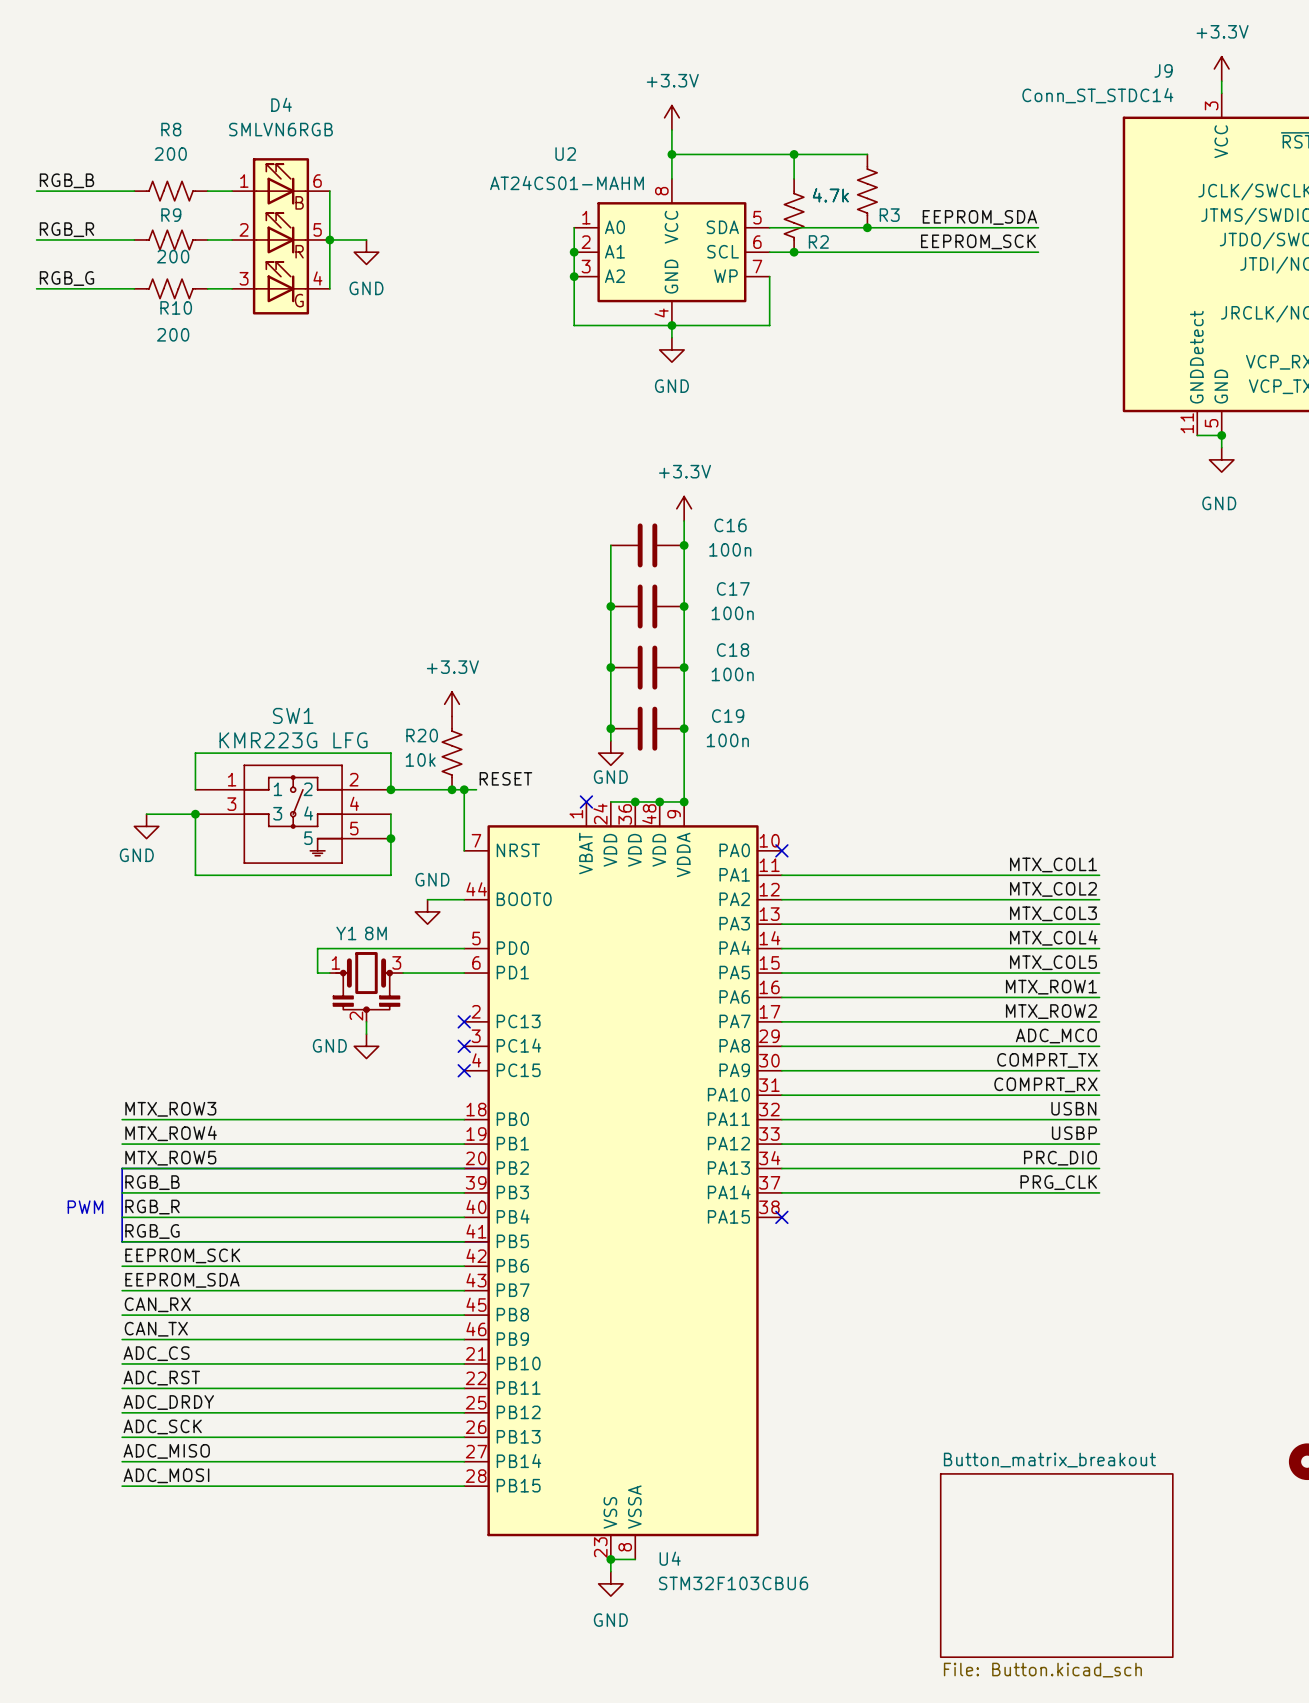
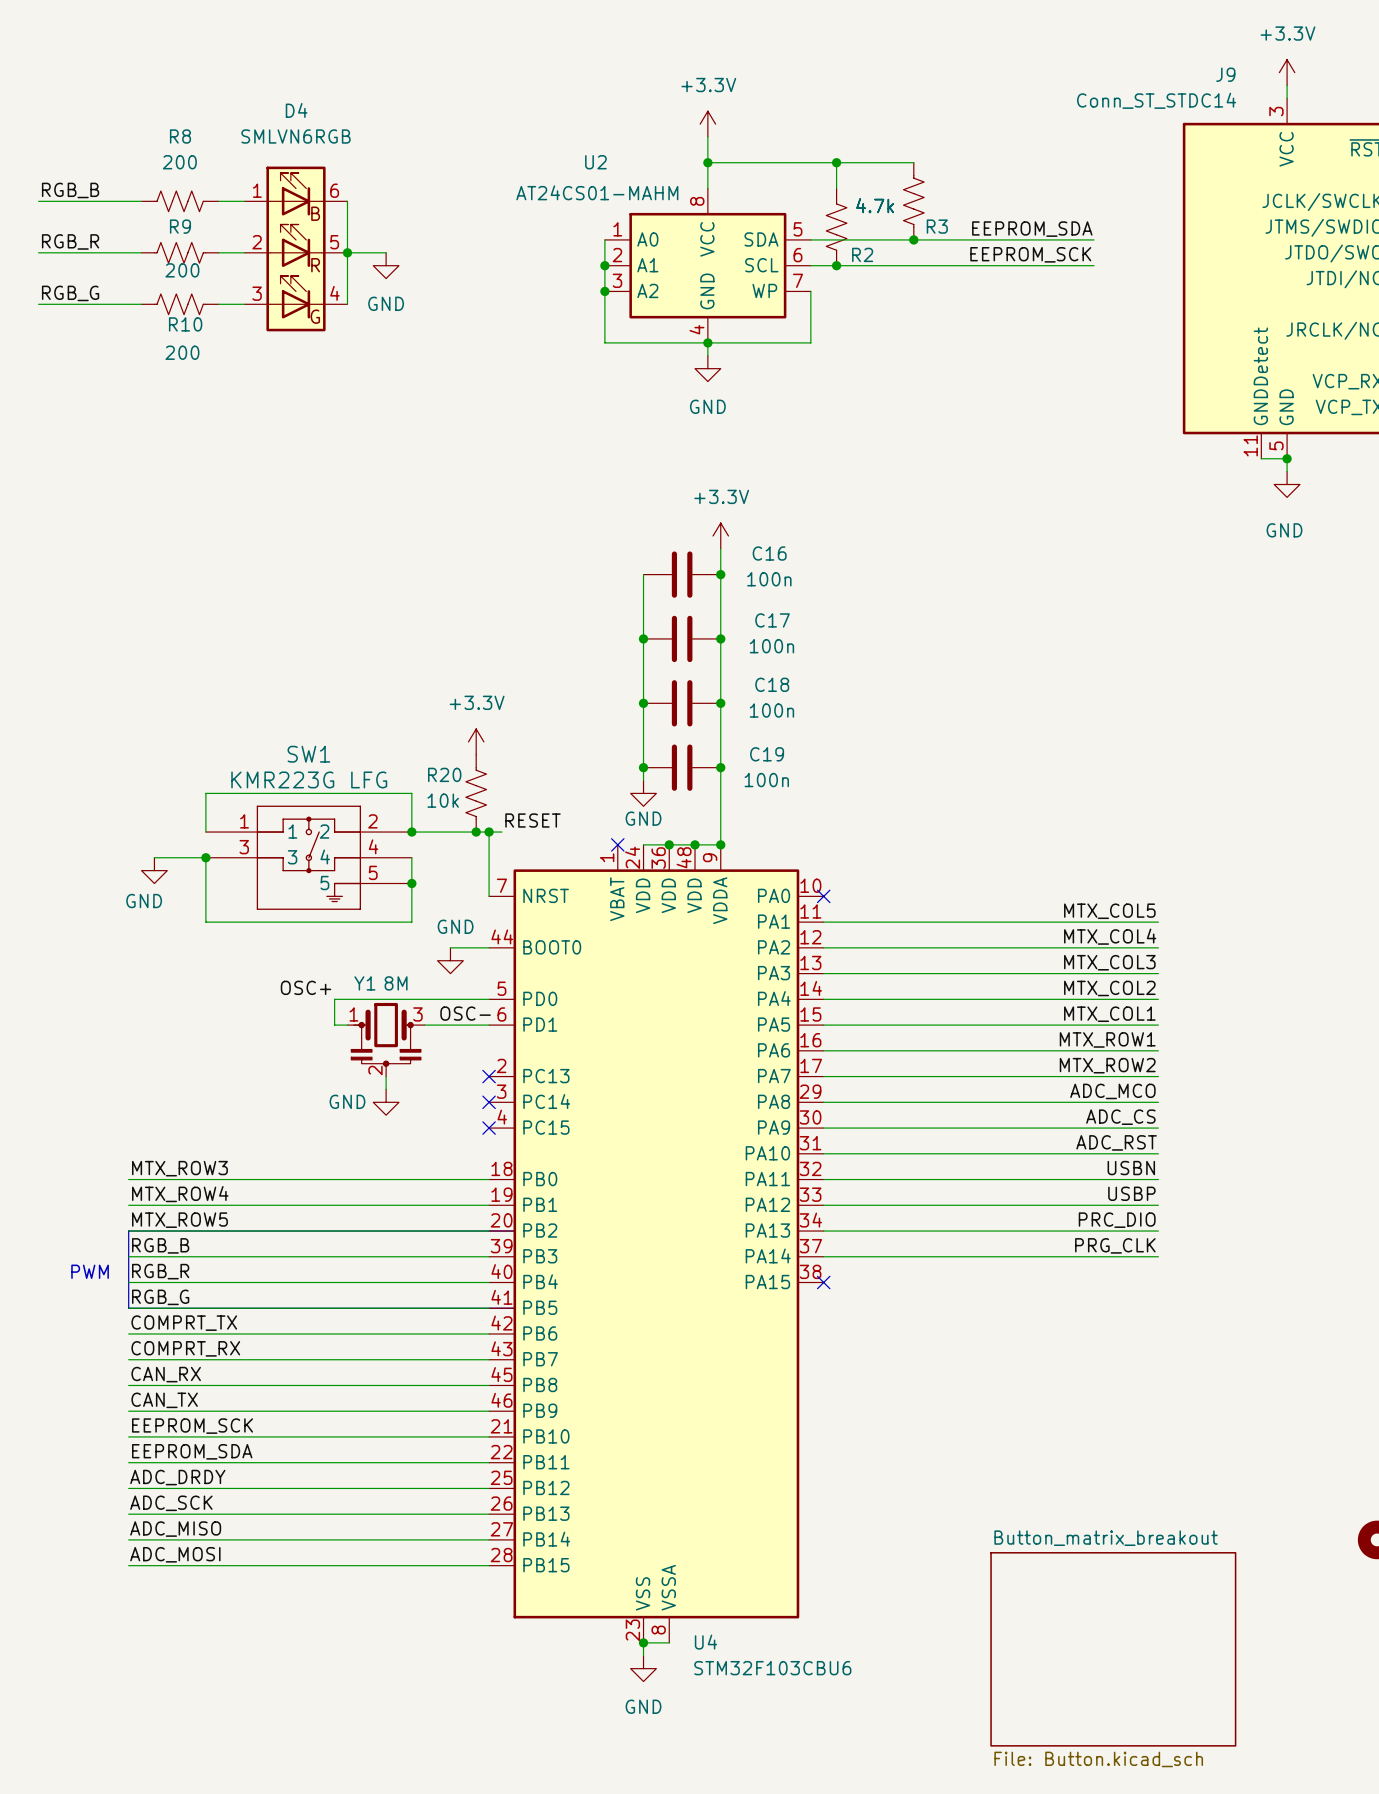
label: MTX_COL1 (1053, 864) -> MTX_COL5 (1109, 911)
label: MTX_COL2 (1053, 889) -> MTX_COL4 (1110, 936)
label: none -> OSC+ (306, 987)
label: MTX_COL4 (1053, 937) -> MTX_COL2 (1109, 988)
label: none -> OSC- (465, 1013)
label: MTX_COL5 (1053, 962) -> MTX_COL1 (1109, 1014)
label: COMPRT_TX (1047, 1060) -> ADC_CS (1120, 1117)
label: COMPRT_RX (1045, 1084) -> ADC_RST (1116, 1142)
label: EEPROM_SCK (182, 1255) -> COMPRT_TX (184, 1323)
label: EEPROM_SDA (182, 1280) -> COMPRT_RX (185, 1348)
label: ADC_CS (156, 1353) -> EEPROM_SCK (192, 1426)
label: ADC_RST (161, 1378) -> EEPROM_SDA (192, 1451)

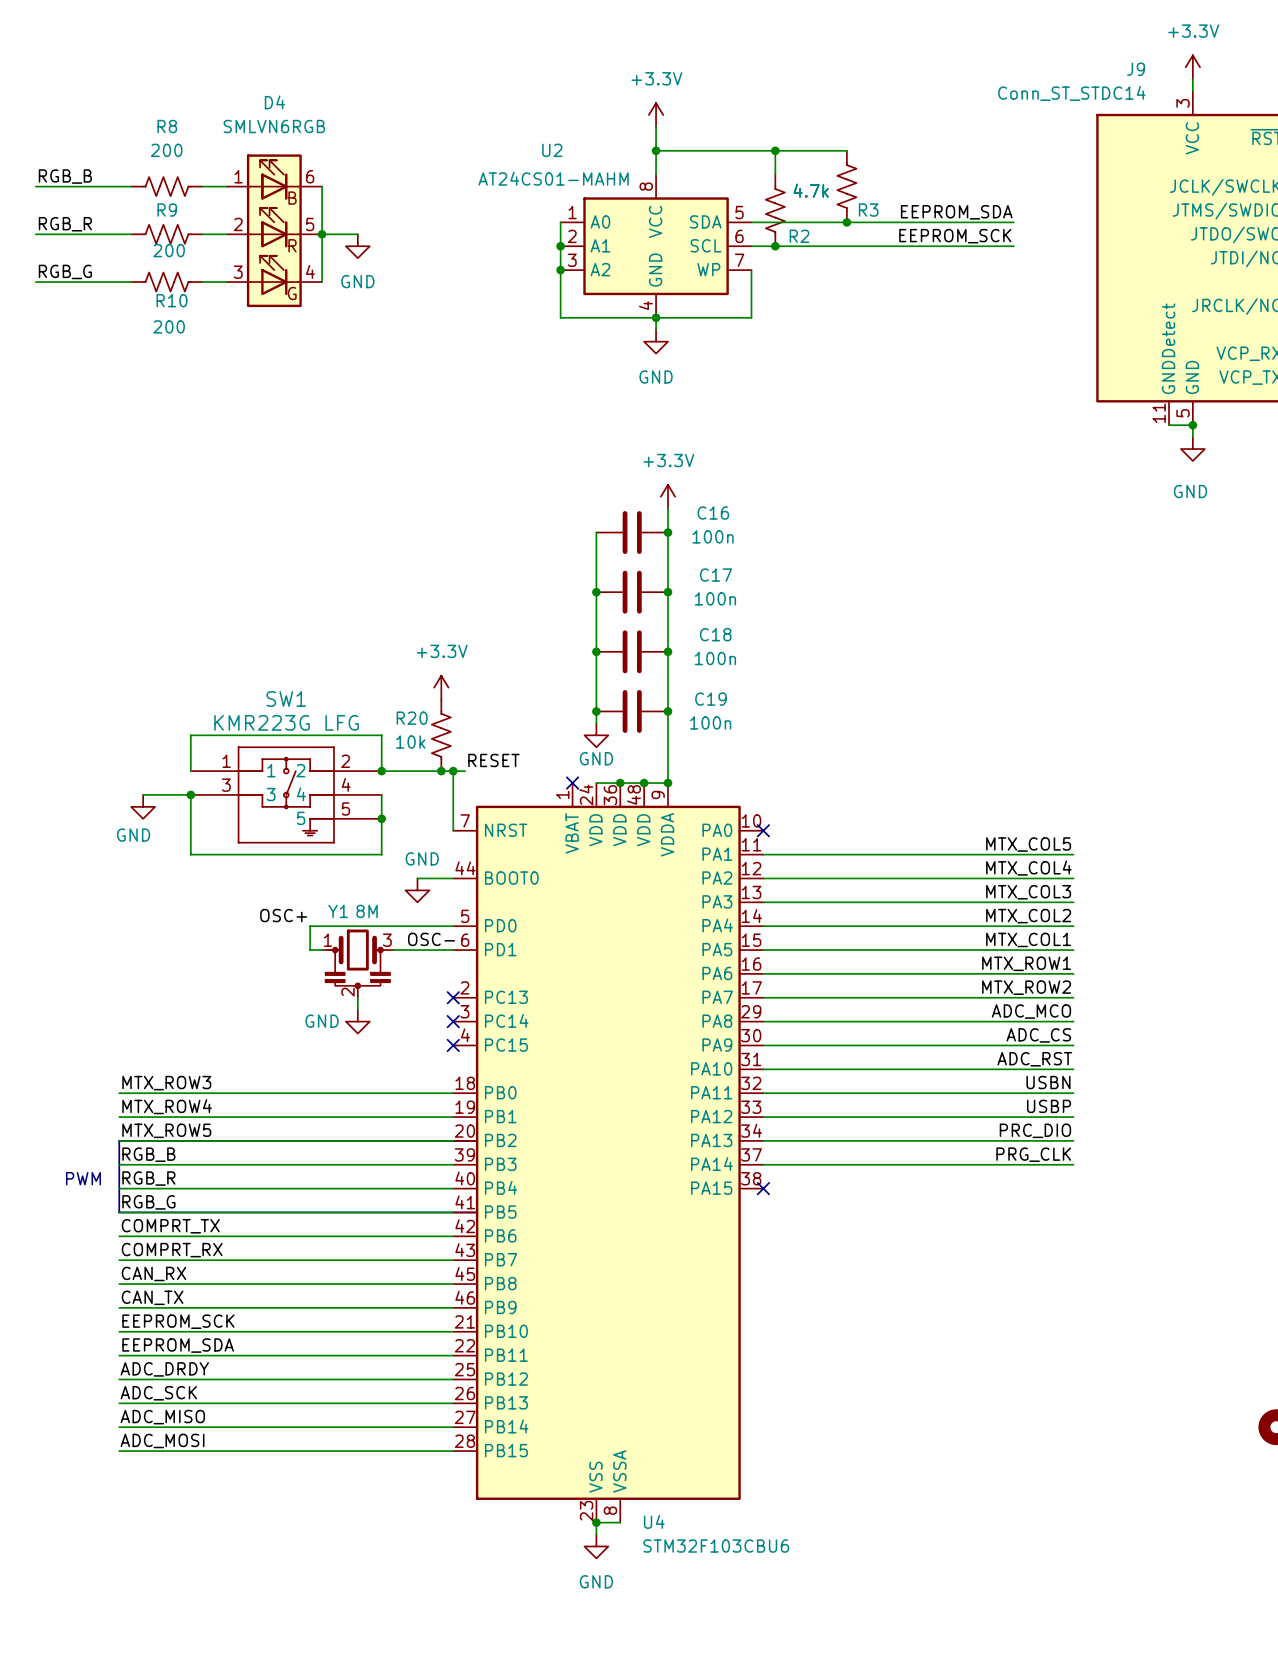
sheet Button_matrix_breakout: File: Button.kicad_sch (1113, 1649) -> none

